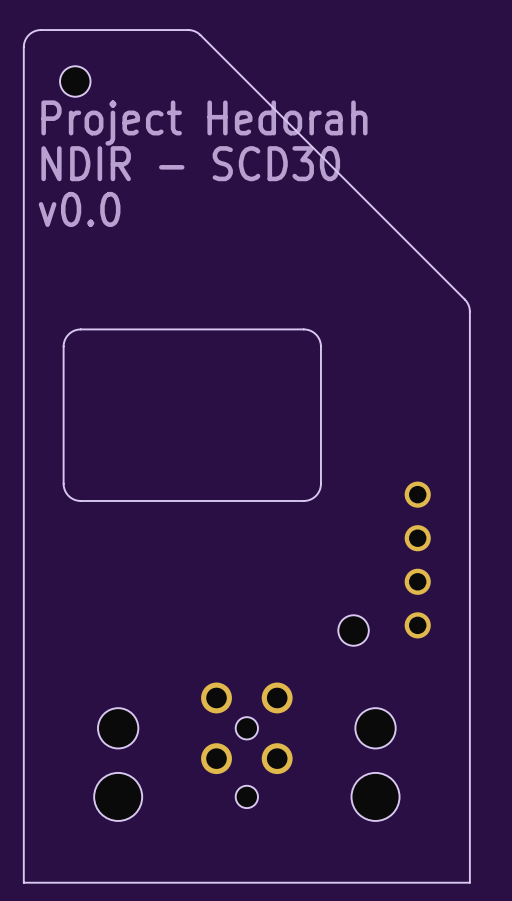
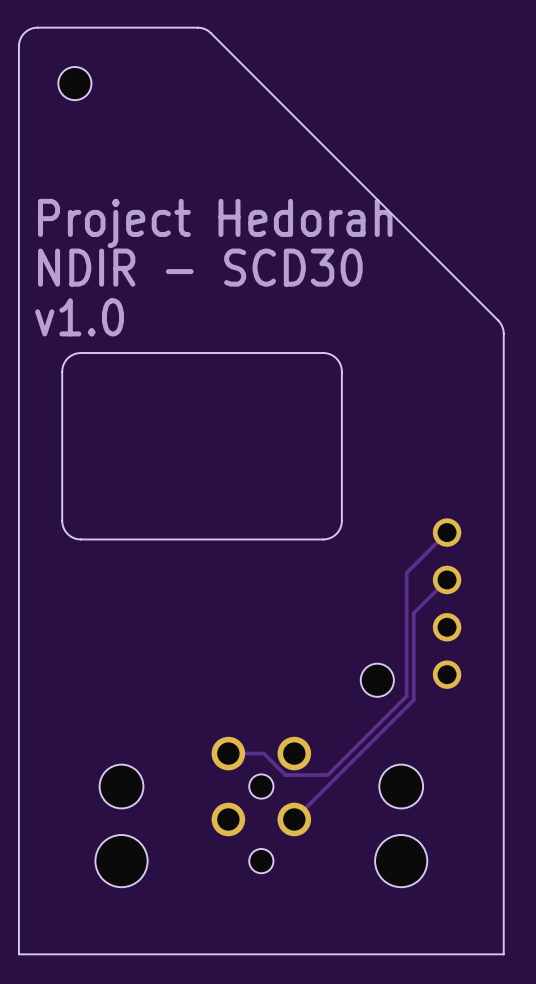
text position: Project Hedorah (204, 123) -> Project Hedorah (215, 223)
text position: NDIR - SCD30 (190, 163) -> NDIR - SCD30 (200, 267)
text: v0.0 (79, 209) -> none
text: none -> v1.0 (79, 317)
track: none -> (447, 532) (406, 572) (406, 696) (327, 775) (285, 775) (263, 753) (228, 753)
track: none -> (447, 579) (413, 613) (413, 700) (294, 819)

